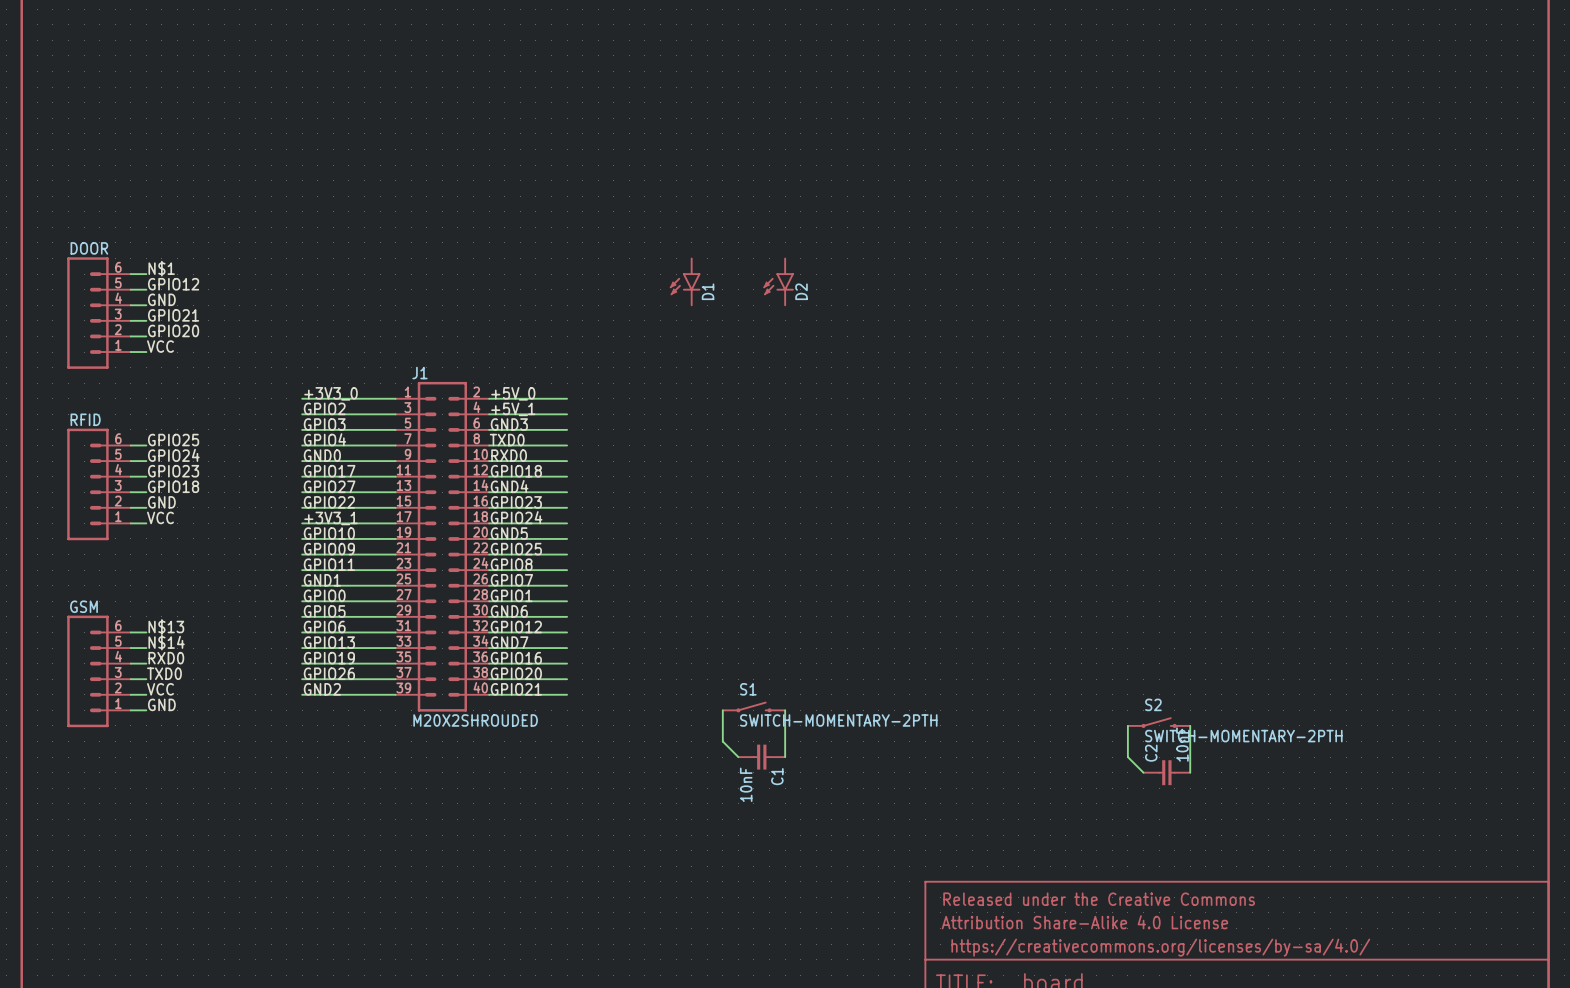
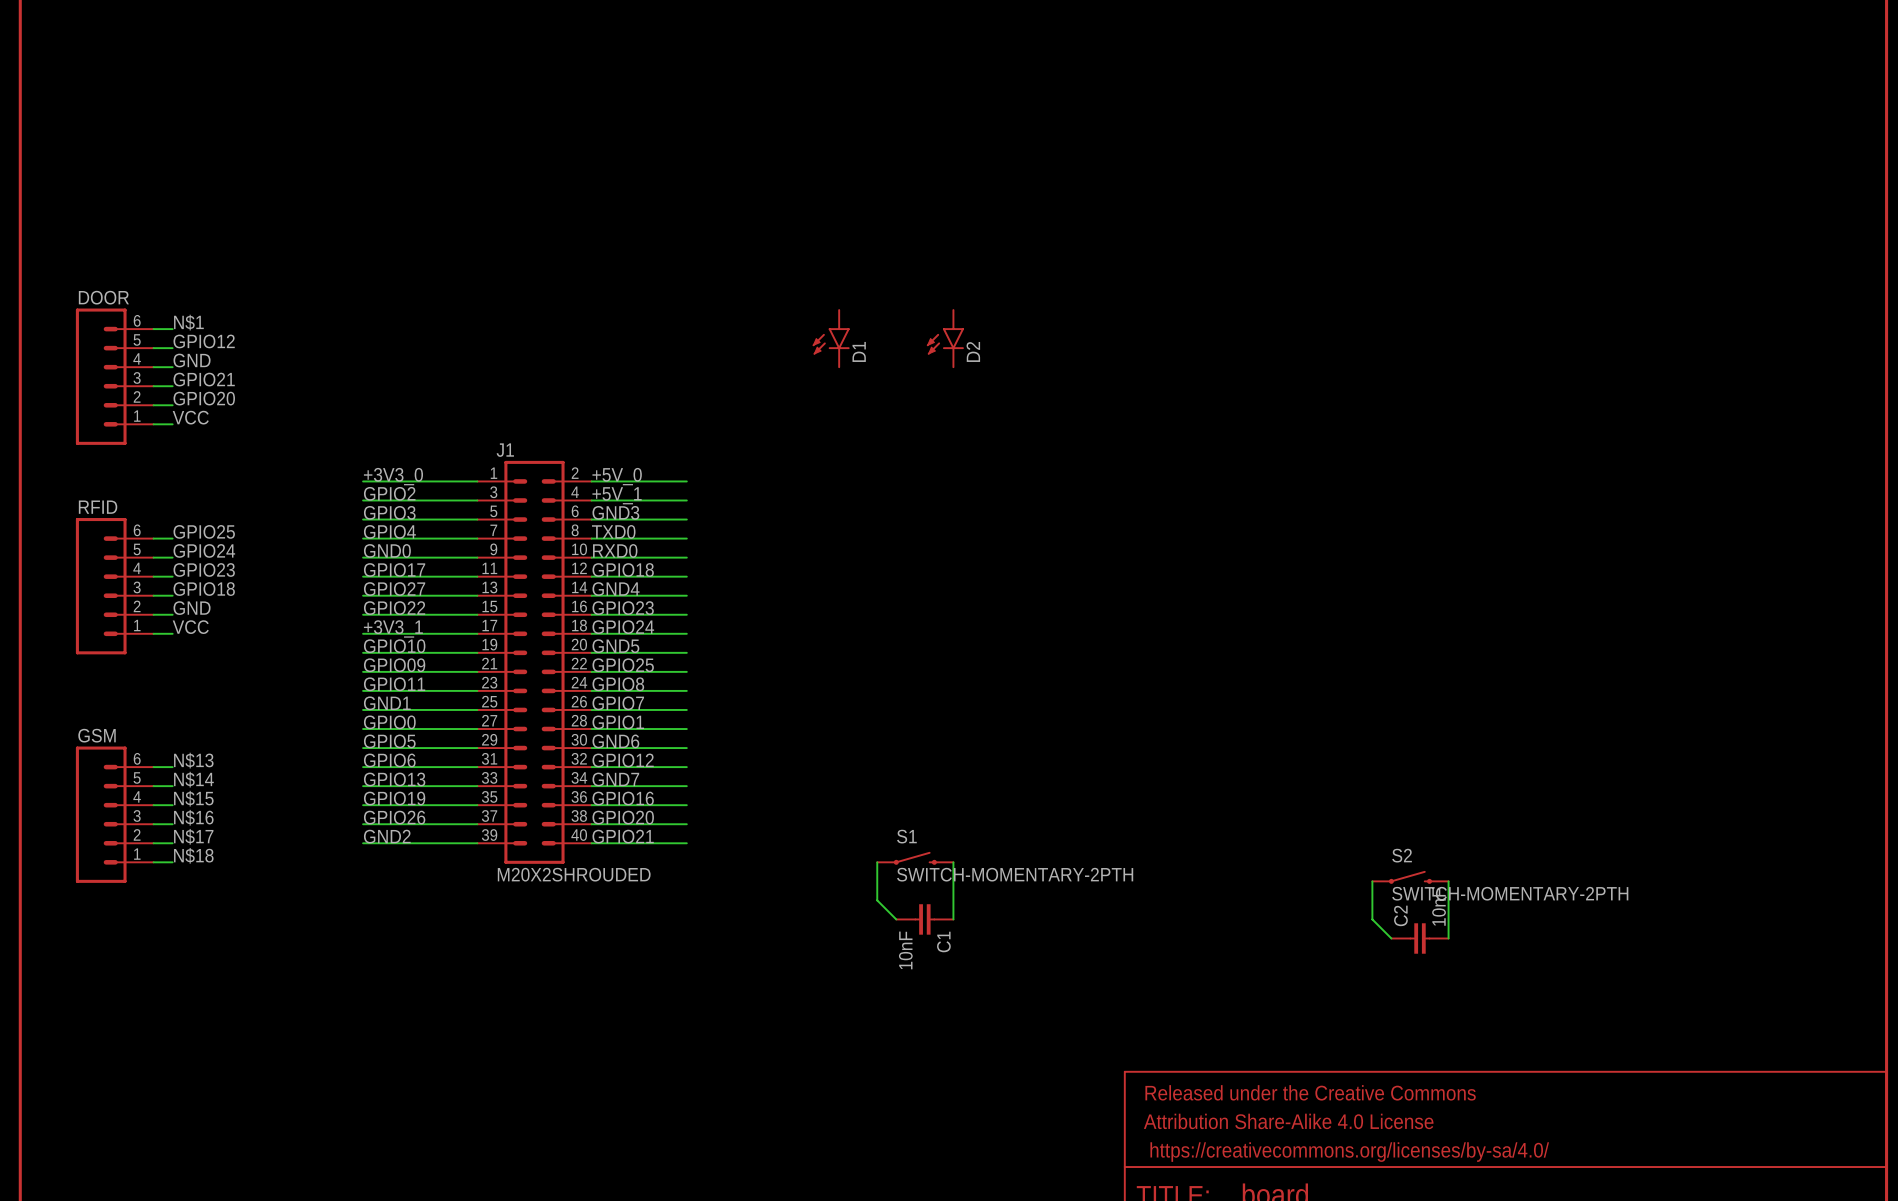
label: RXD0 (166, 658) -> N$15 (193, 798)
label: TXD0 (164, 673) -> N$16 (193, 817)
label: VCC (160, 689) -> N$17 (193, 836)
label: GND (161, 704) -> N$18 (193, 855)

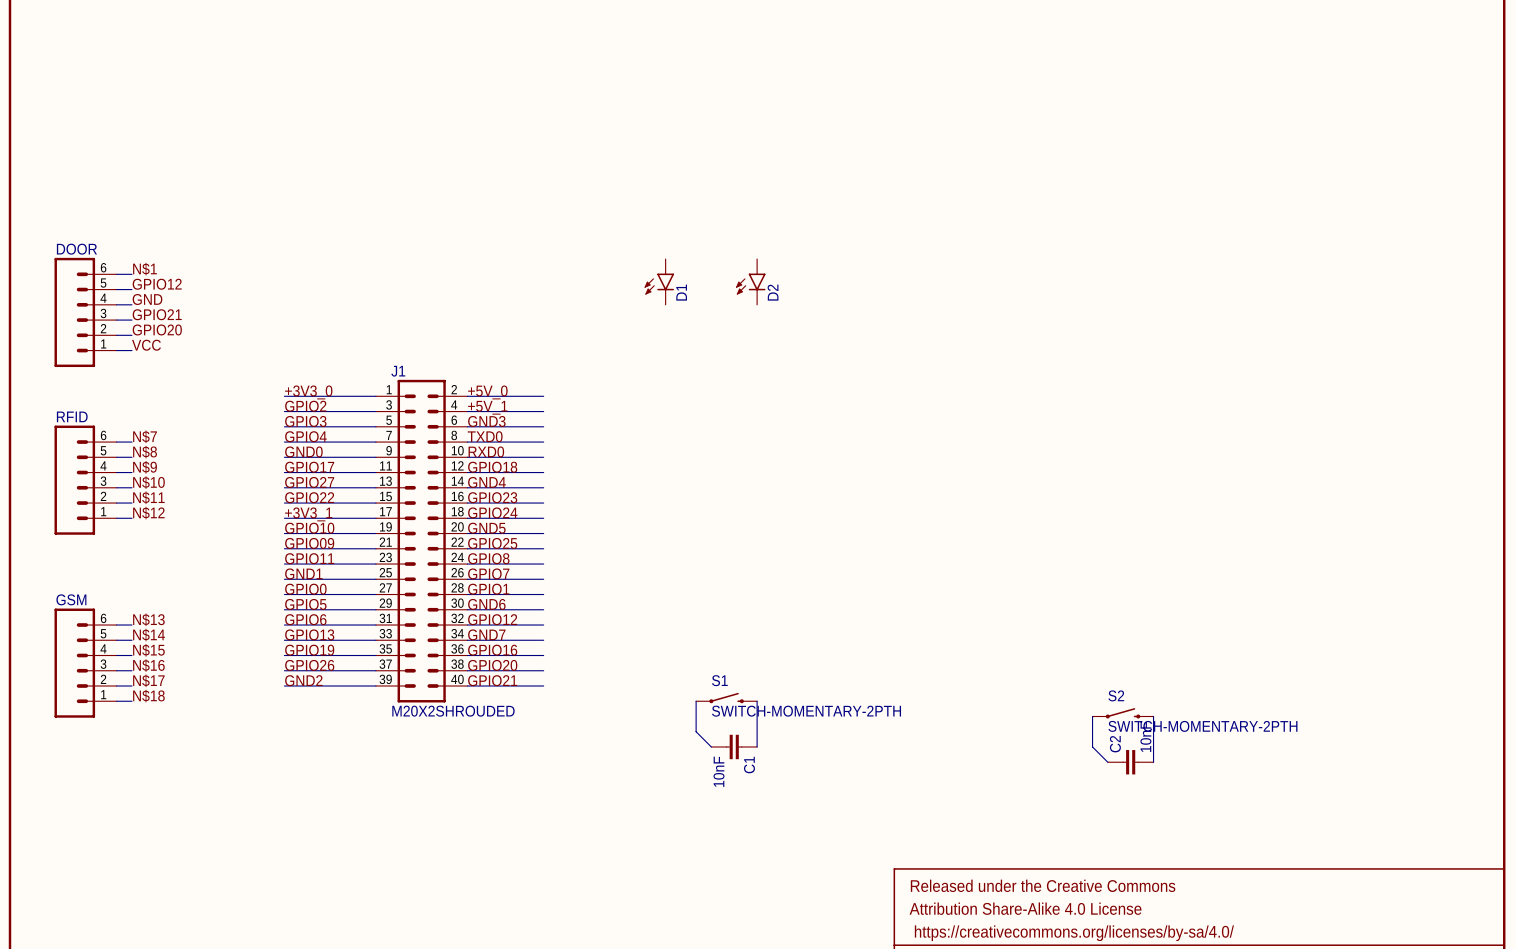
label: GPIO25 (204, 531) -> N$7 (145, 436)
label: GPIO24 (204, 550) -> N$8 (145, 452)
label: GPIO23 (204, 569) -> N$9 (145, 467)
label: GPIO18 (204, 589) -> N$10 (148, 482)
label: GND (192, 608) -> N$11 (148, 497)
label: VCC (190, 627) -> N$12 (148, 513)

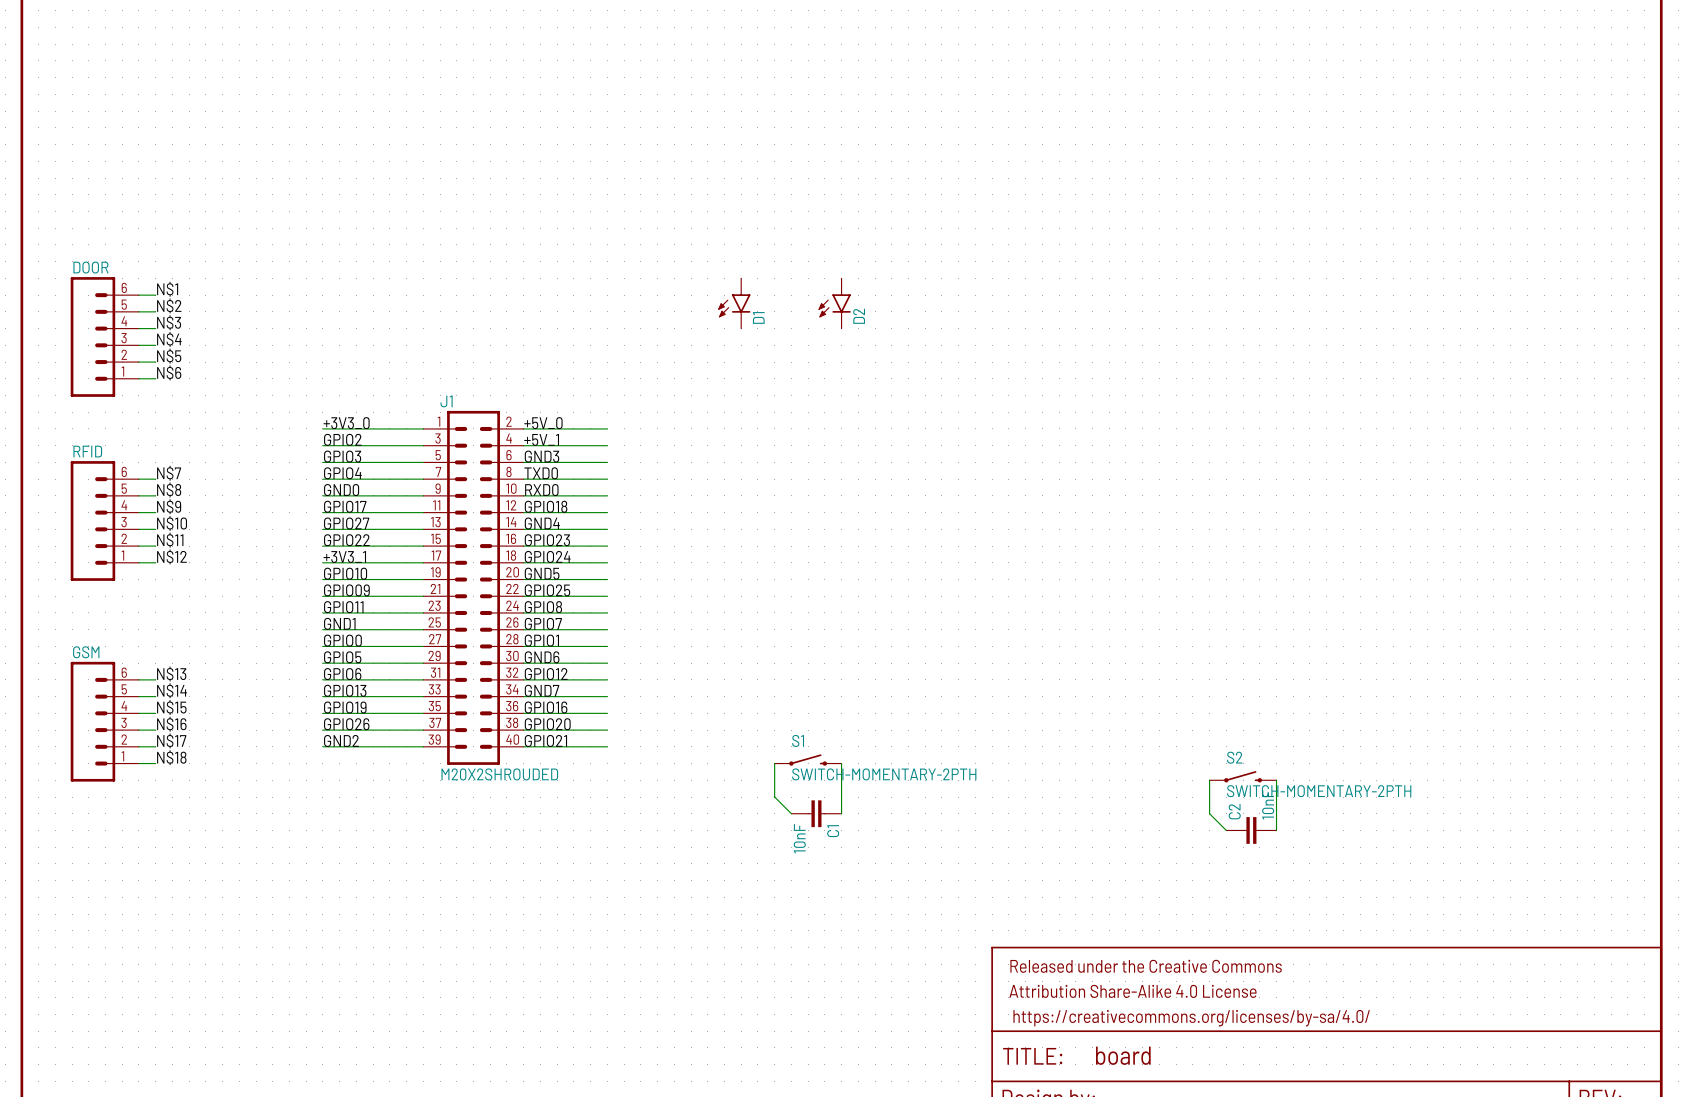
label: GPIO12 (157, 284) -> N$2 (169, 305)
label: GND (147, 299) -> N$3 (169, 322)
label: GPIO21 (157, 314) -> N$4 (169, 339)
label: GPIO20 (157, 329) -> N$5 (169, 356)
label: VCC (146, 345) -> N$6 (169, 372)

